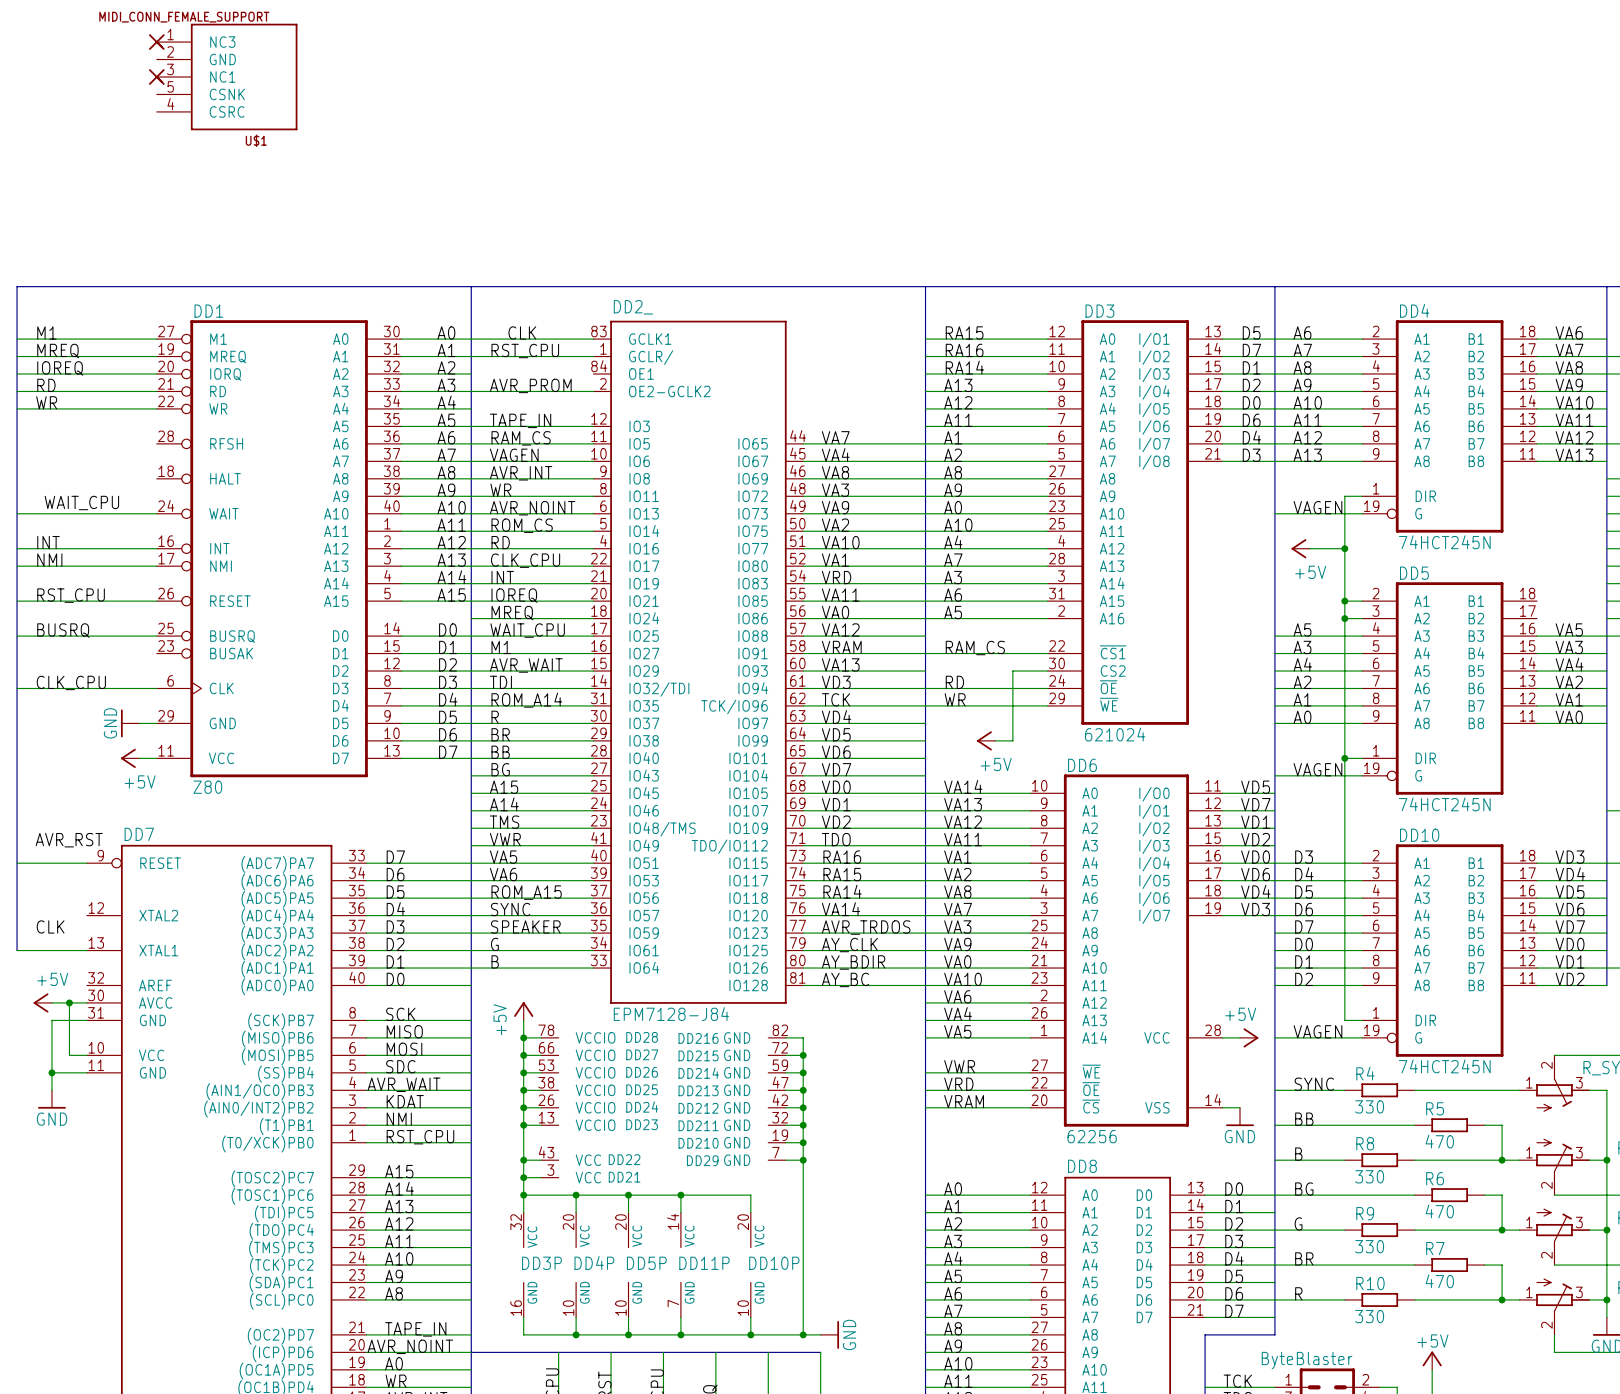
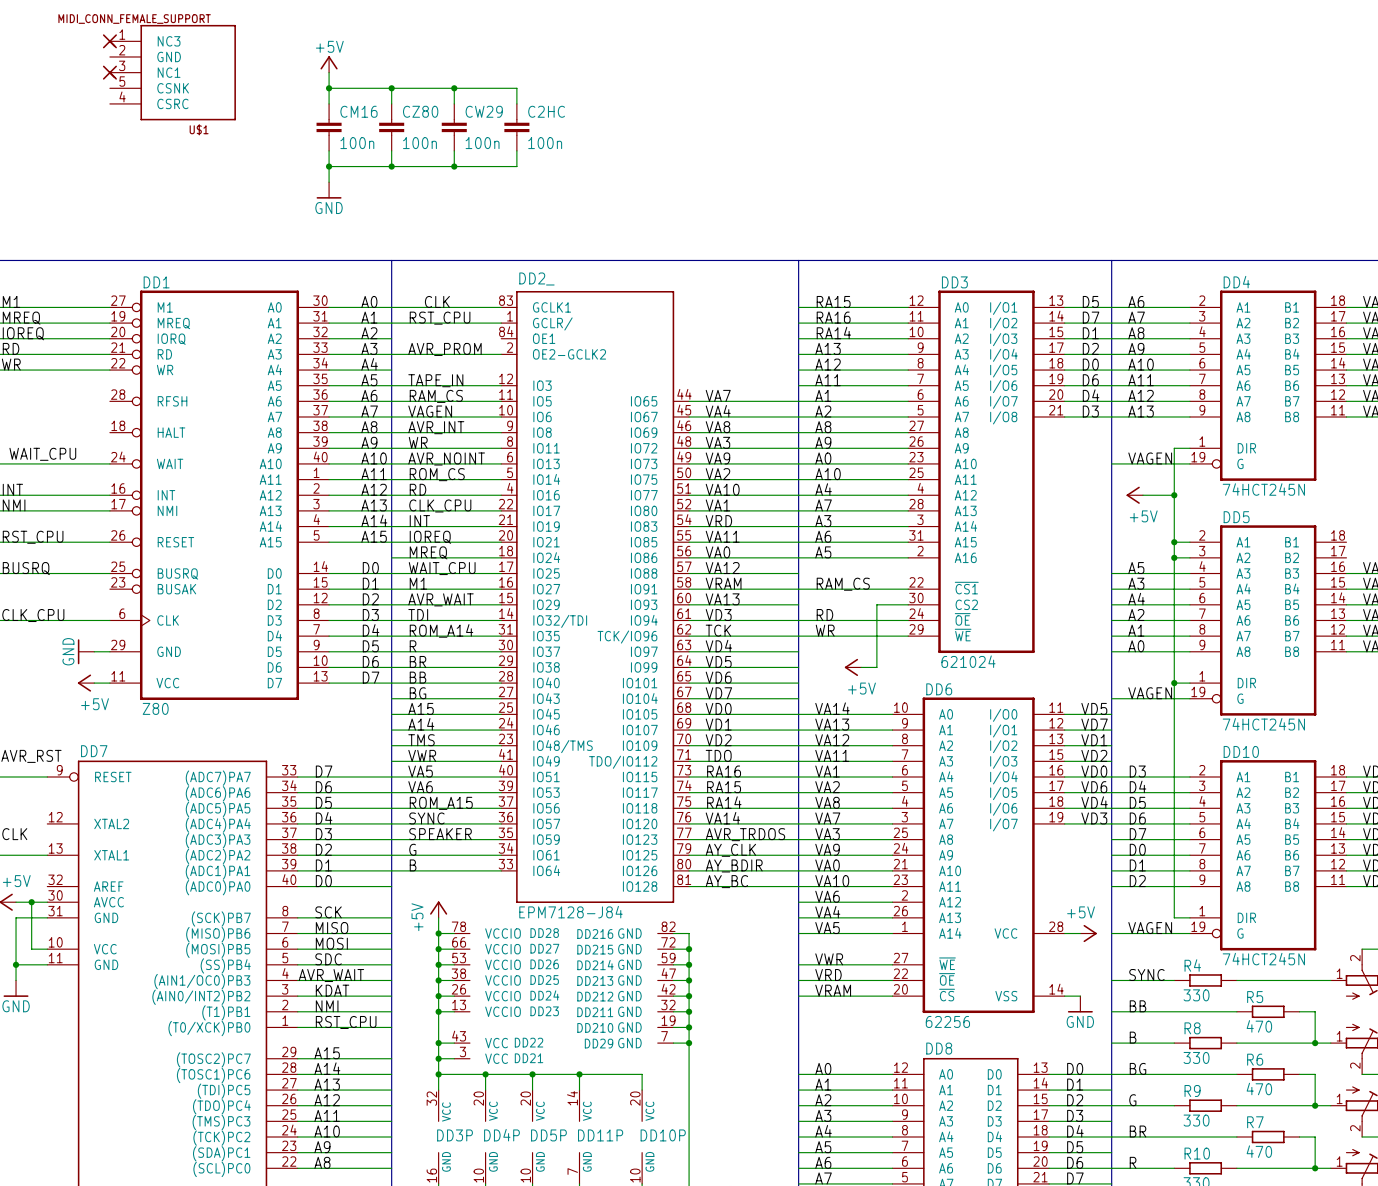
power symbol: none -> +5V (329, 64)
wire: none -> (329, 72) (329, 103)
wire: none -> (329, 88) (516, 88) (516, 103)
junction: none -> (329, 88)
wire: none -> (391, 88) (391, 103)
junction: none -> (391, 88)
wire: none -> (454, 88) (454, 103)
junction: none -> (454, 88)
CM16: none -> 100n (329, 127)
CZ80: none -> 100n (391, 127)
CW29: none -> 100n (454, 127)
C2HC: none -> 100n (516, 127)
wire: none -> (329, 150) (329, 182)
wire: none -> (391, 150) (391, 166)
wire: none -> (454, 150) (454, 166)
wire: none -> (516, 150) (516, 166) (329, 166)
junction: none -> (329, 166)
junction: none -> (391, 166)
junction: none -> (454, 166)
power symbol: none -> GND (329, 190)

